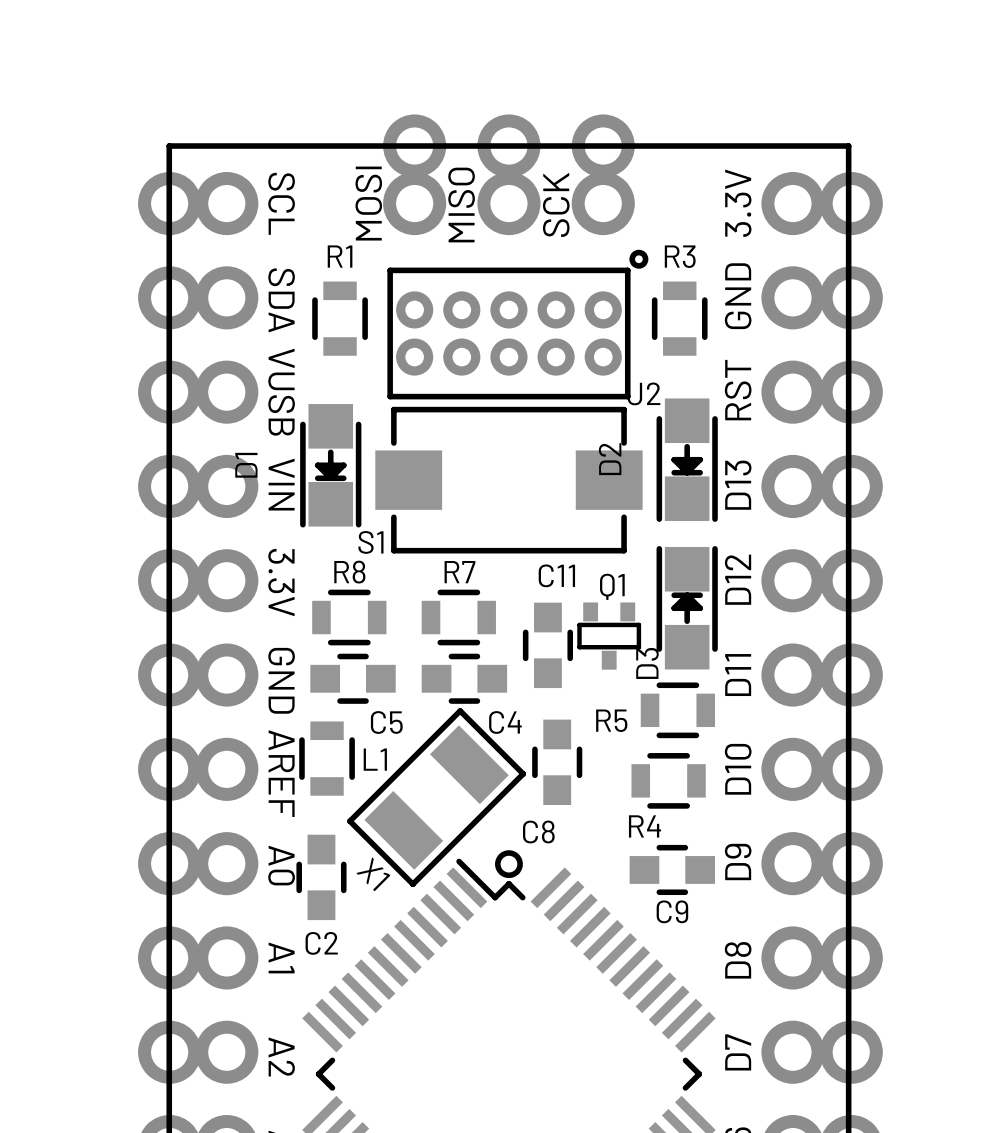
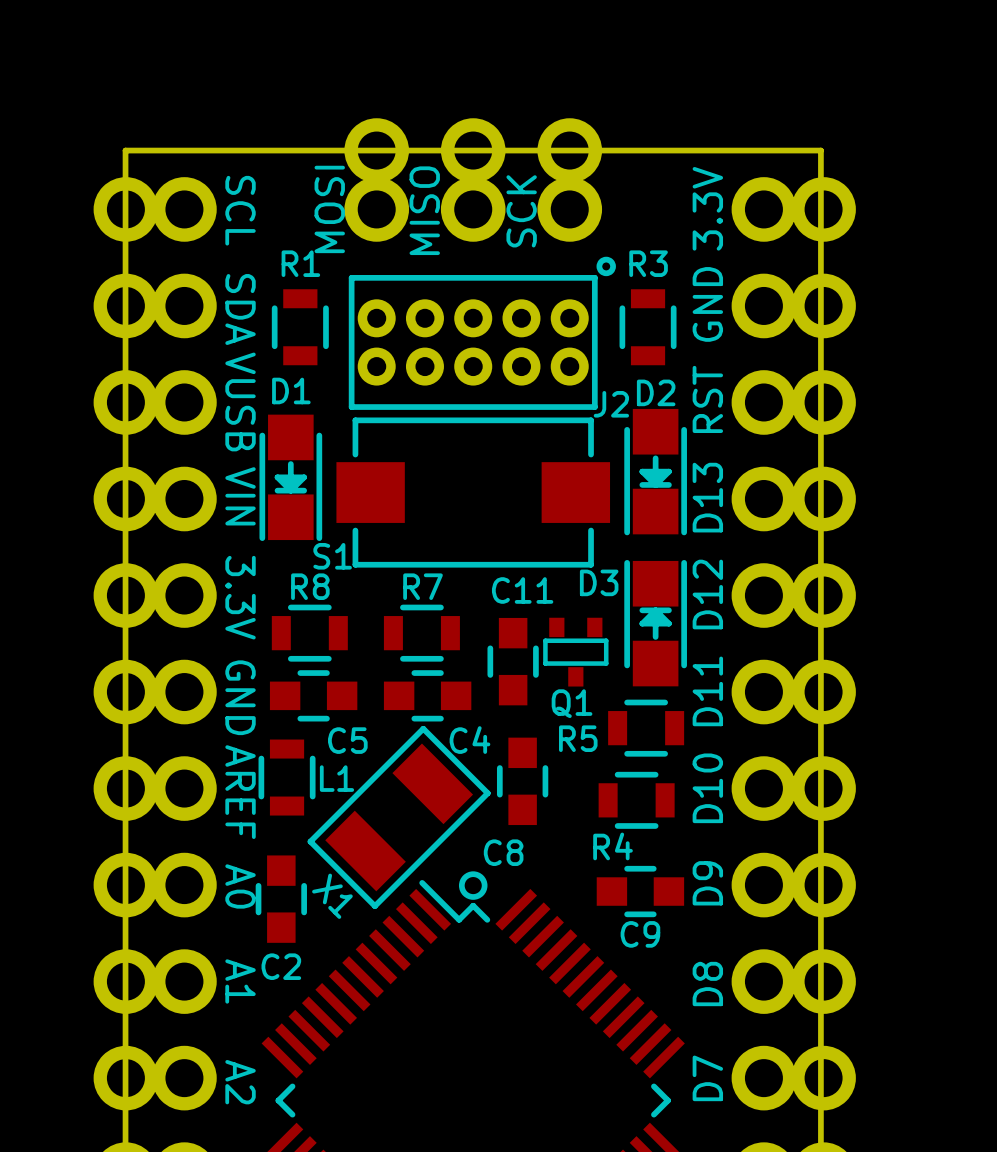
D2 name rotation: 0° (610, 459) -> 90° clockwise (656, 392)
D2 name position: D2 (610, 459) -> D2 (656, 392)
D1 name rotation: 0° (246, 465) -> 90° clockwise (291, 390)
D1 name position: D1 (246, 465) -> D1 (291, 390)
Q1 name position: Q1 (612, 586) -> Q1 (572, 703)
D3 name rotation: 0° (647, 663) -> 90° clockwise (599, 582)
D3 name position: D3 (647, 663) -> D3 (599, 582)

